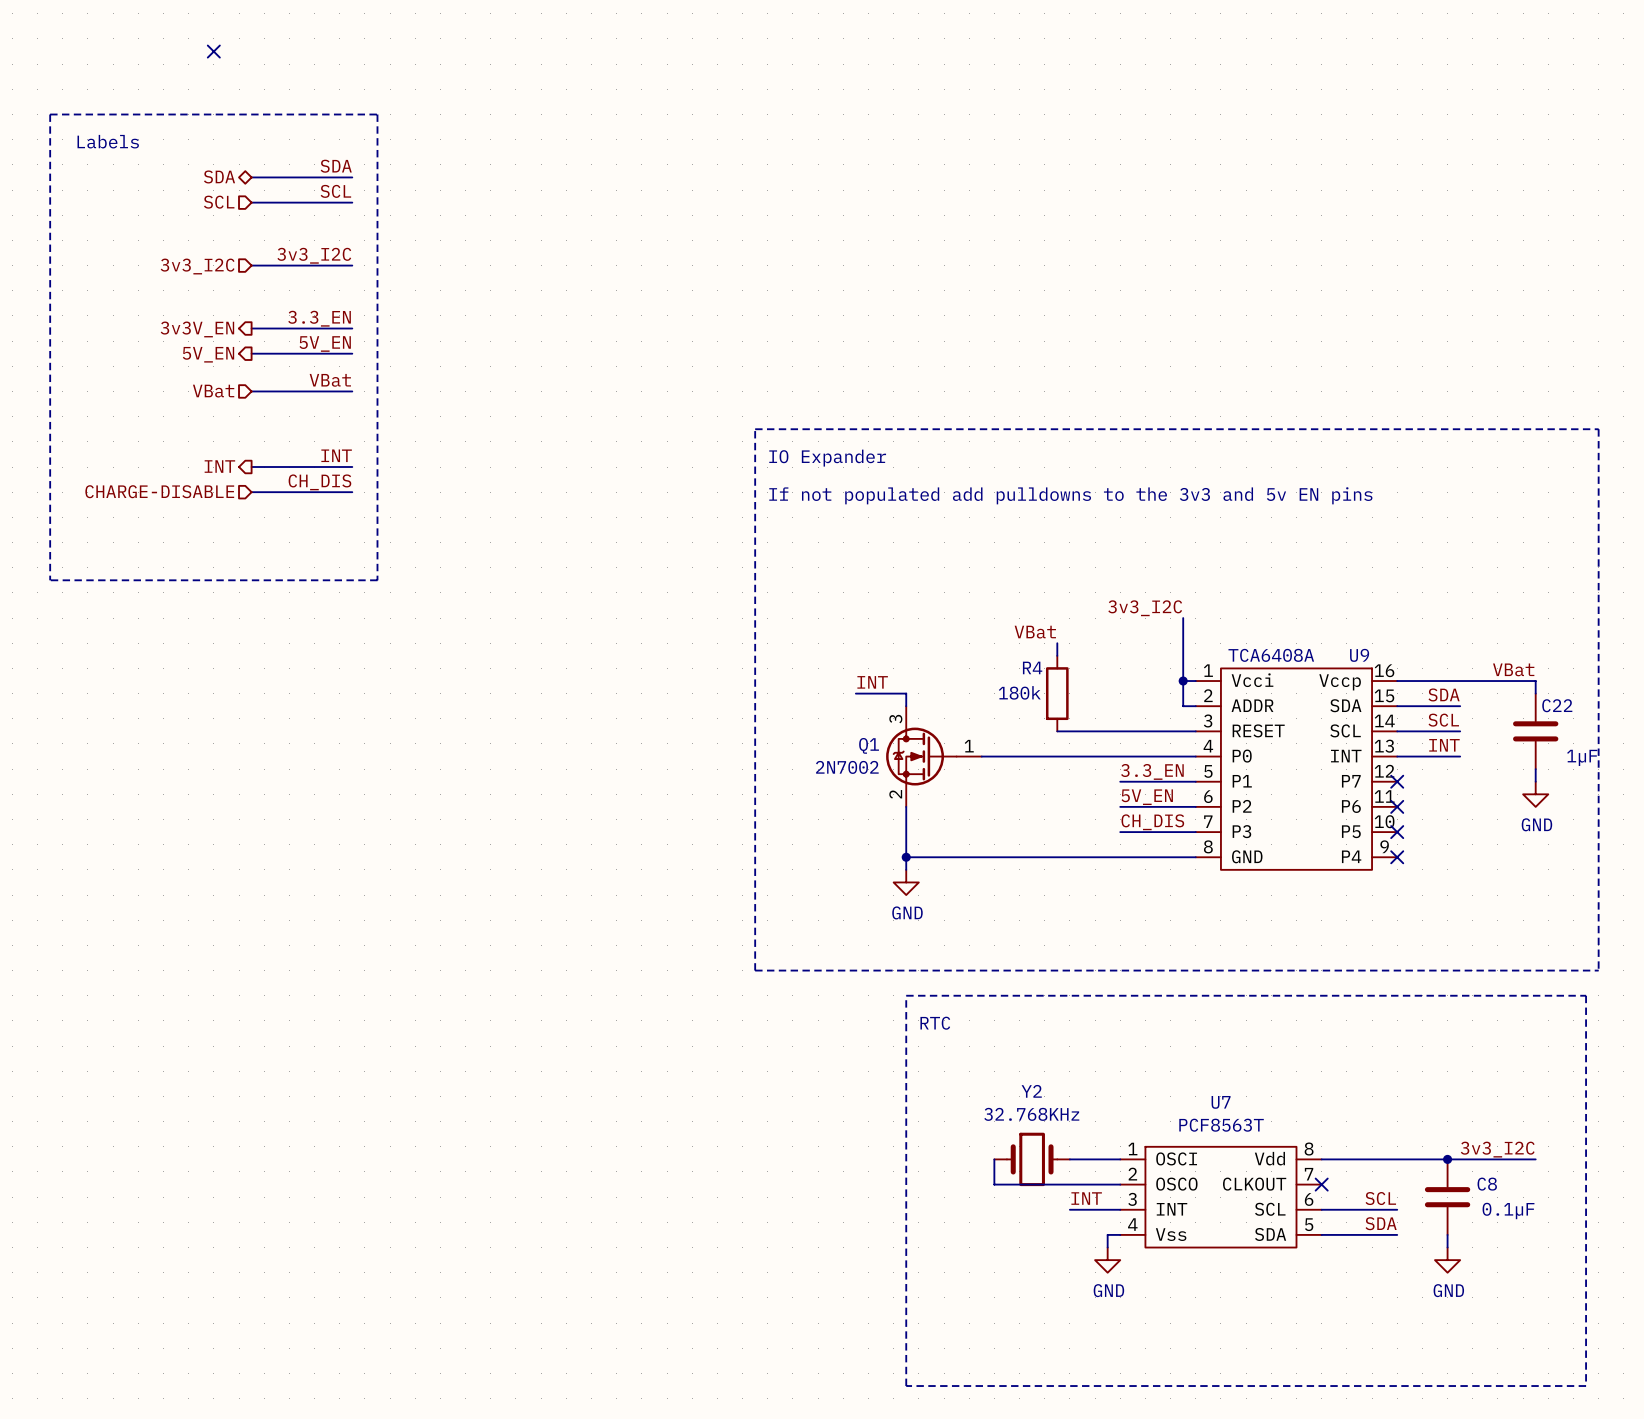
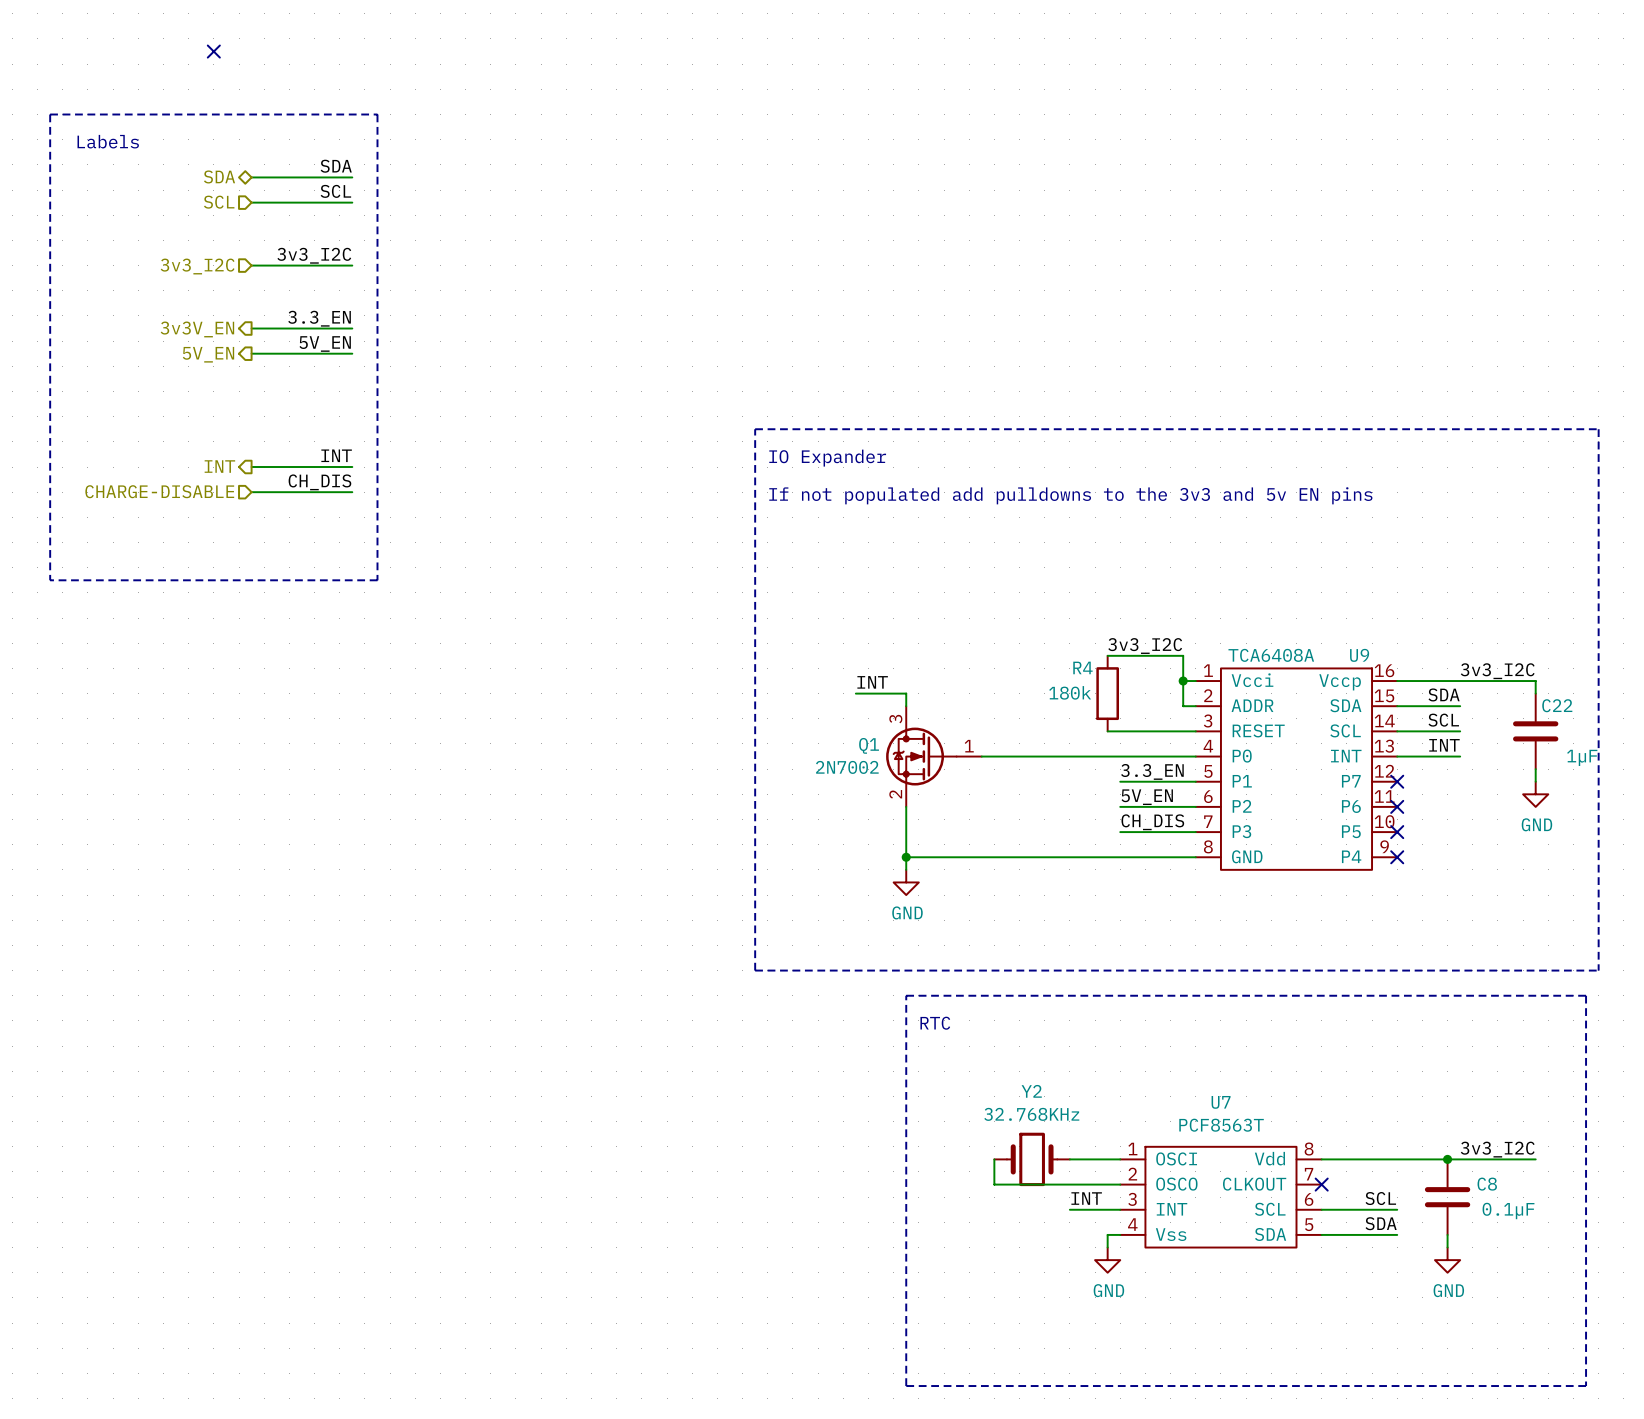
label: VBat (330, 380) -> none
hierarchical label: VBat (213, 391) -> none
wire: (251, 391) (352, 391) -> none
label position: 3v3_I2C (1145, 608) -> 3v3_I2C (1145, 646)
wire: (1183, 618) (1183, 655) -> (1107, 655) (1183, 655)
label: VBat (1035, 632) -> none
wire: (1057, 643) (1057, 655) -> none
label: VBat (1513, 669) -> 3v3_I2C (1497, 671)
R4 position: (1057, 693) -> (1107, 693)
wire: (1057, 731) (1107, 731) -> none

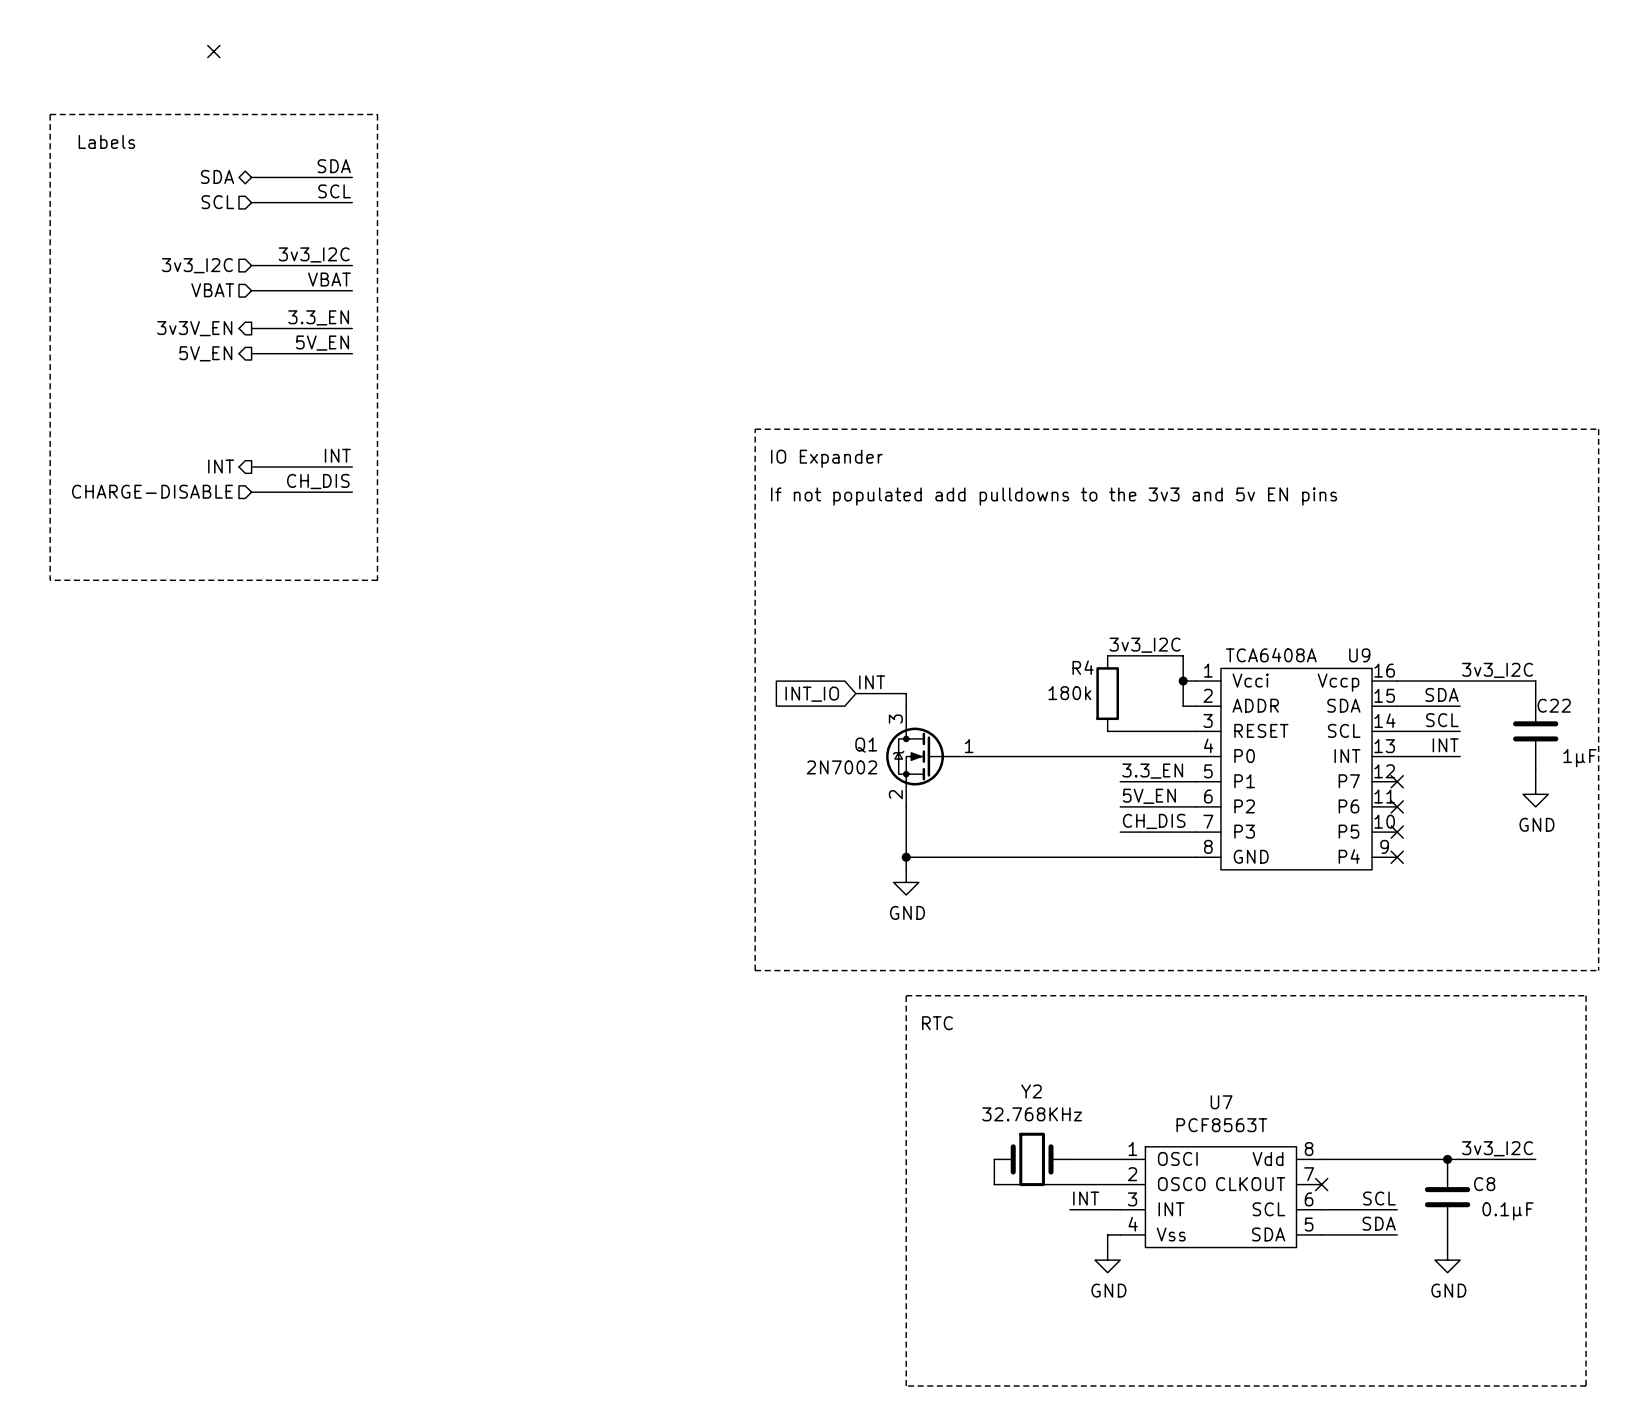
label: none -> VBAT (329, 279)
hierarchical label: none -> VBAT (212, 290)
wire: none -> (251, 290) (352, 290)
global label: none -> INT_IO (812, 694)

